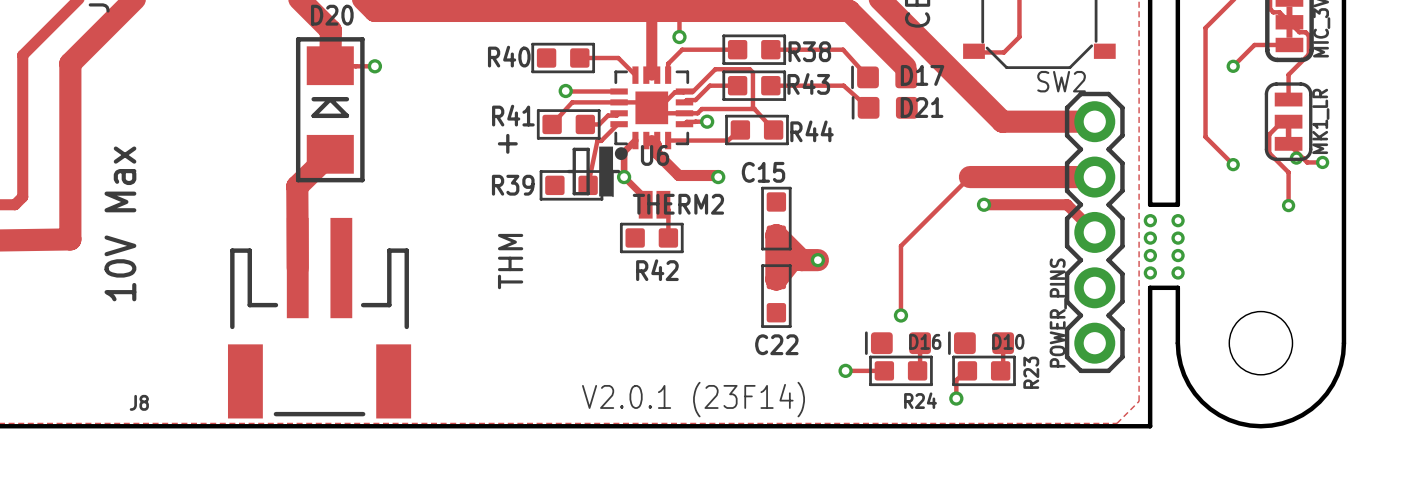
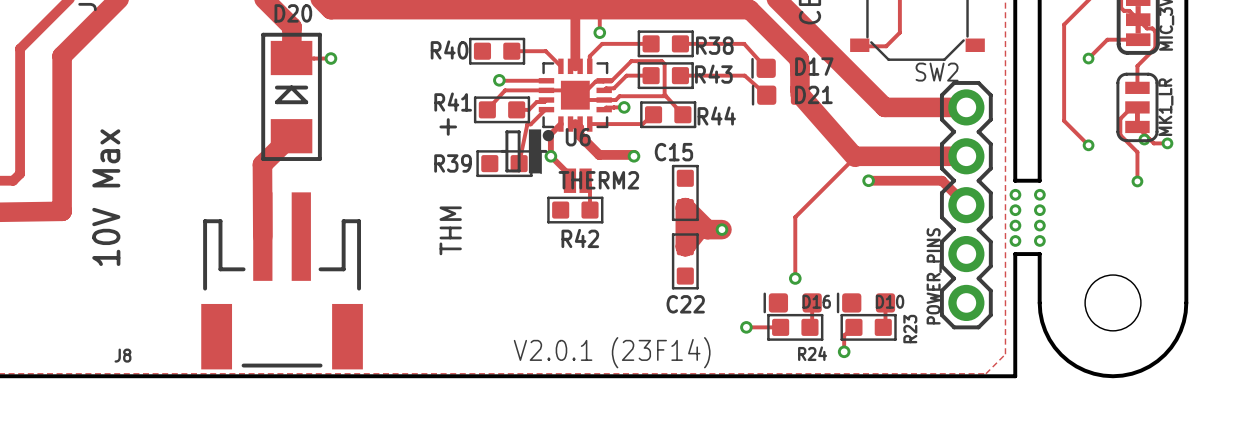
track: none -> (799, 59) (800, 95) (855, 157)

